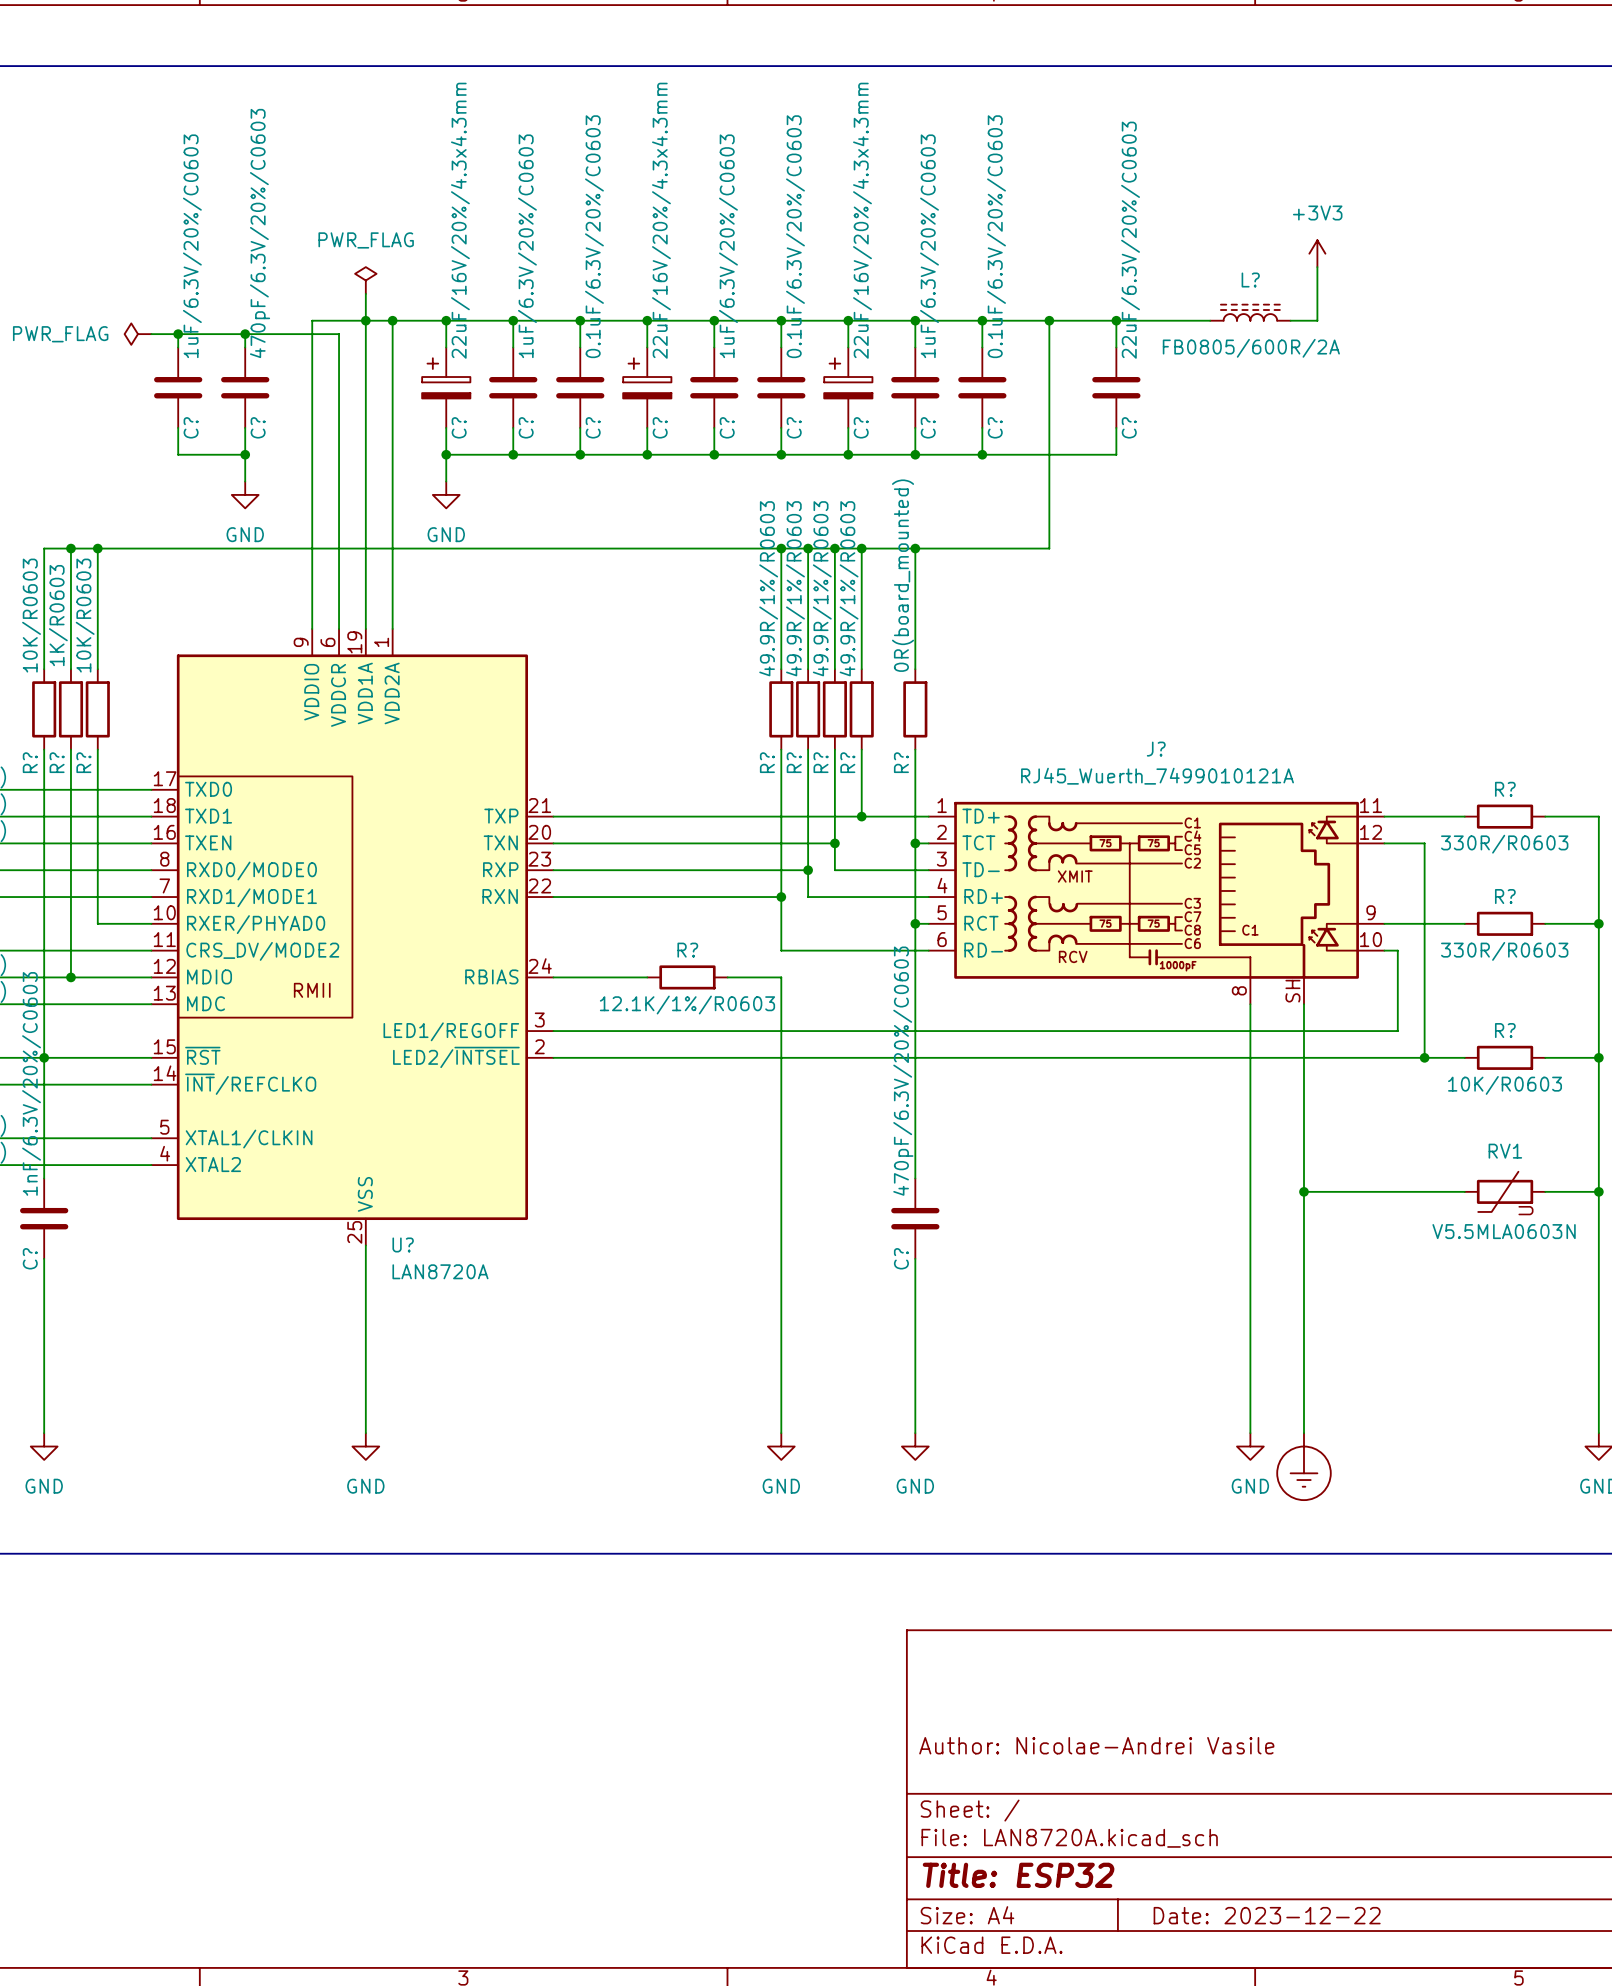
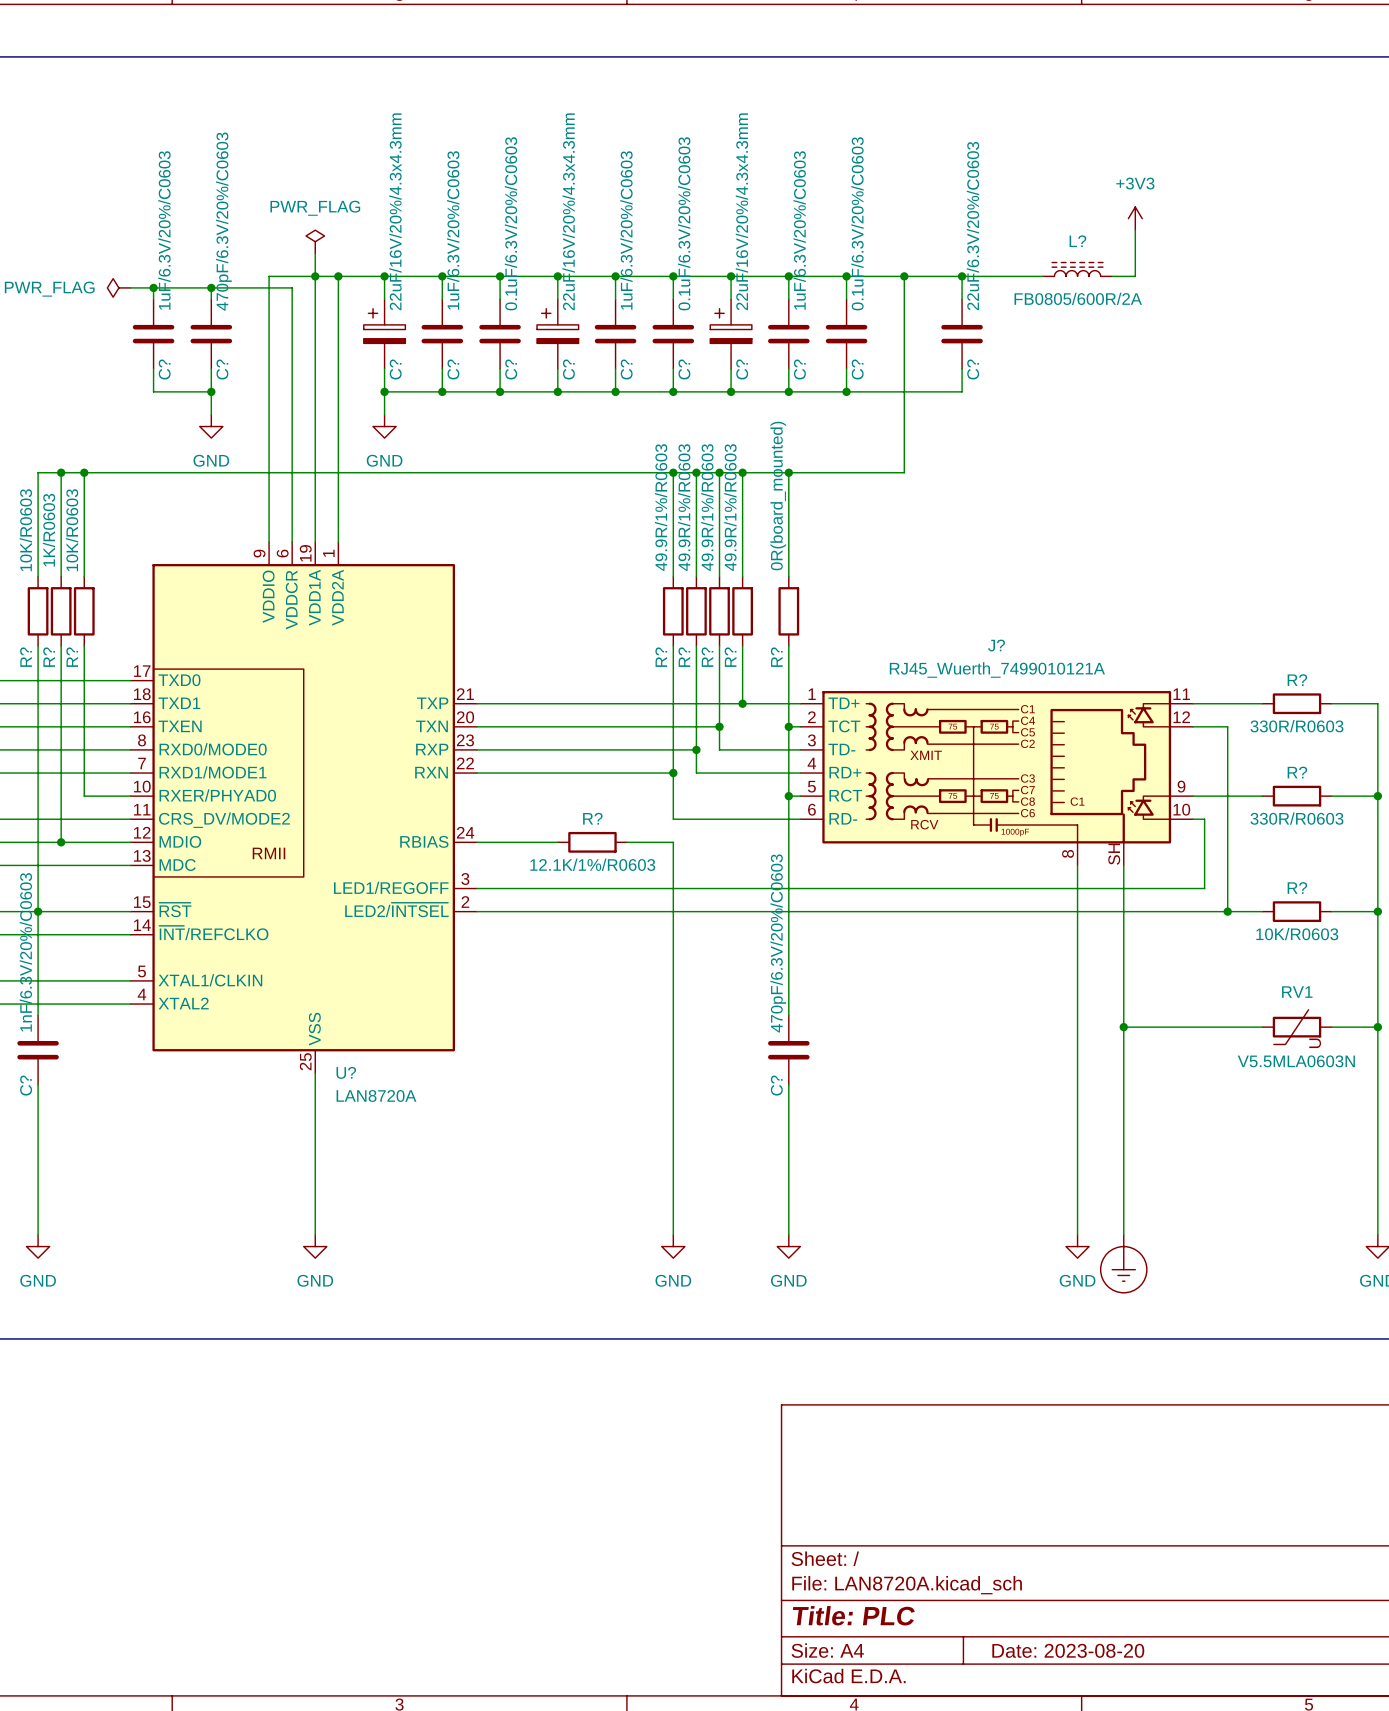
title block: Author: Nicolae-Andrei Vasile (1096, 1745) -> none
title block: Title: ESP32 (1018, 1875) -> Title: PLC (853, 1615)
title block: Date: 2023-12-22 (1267, 1915) -> Date: 2023-08-20 (1068, 1650)

